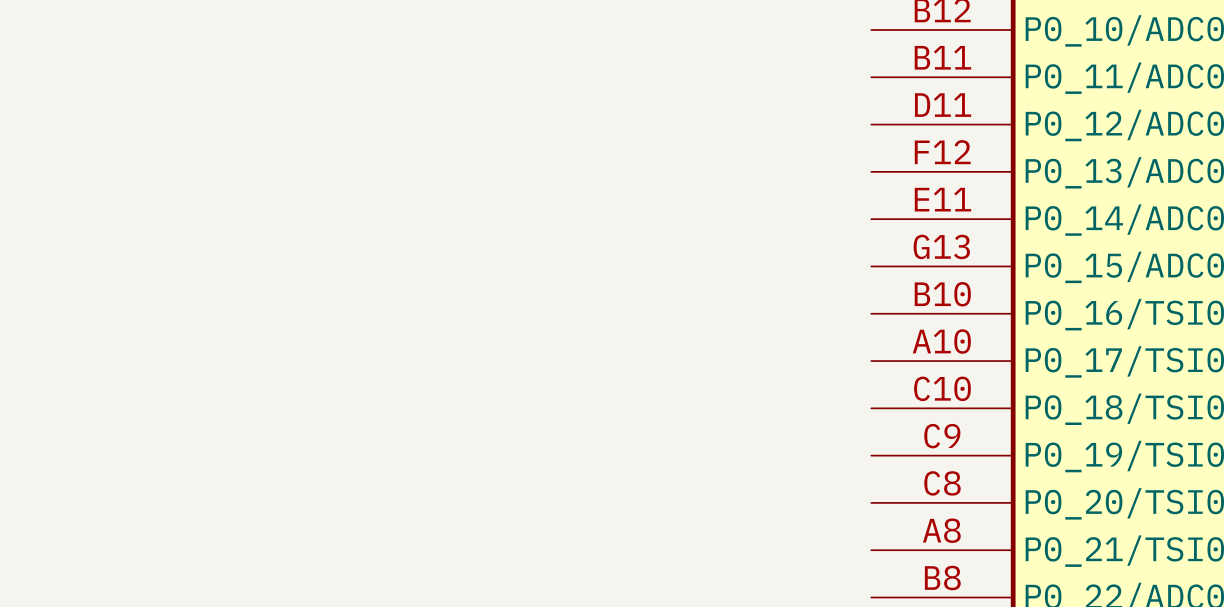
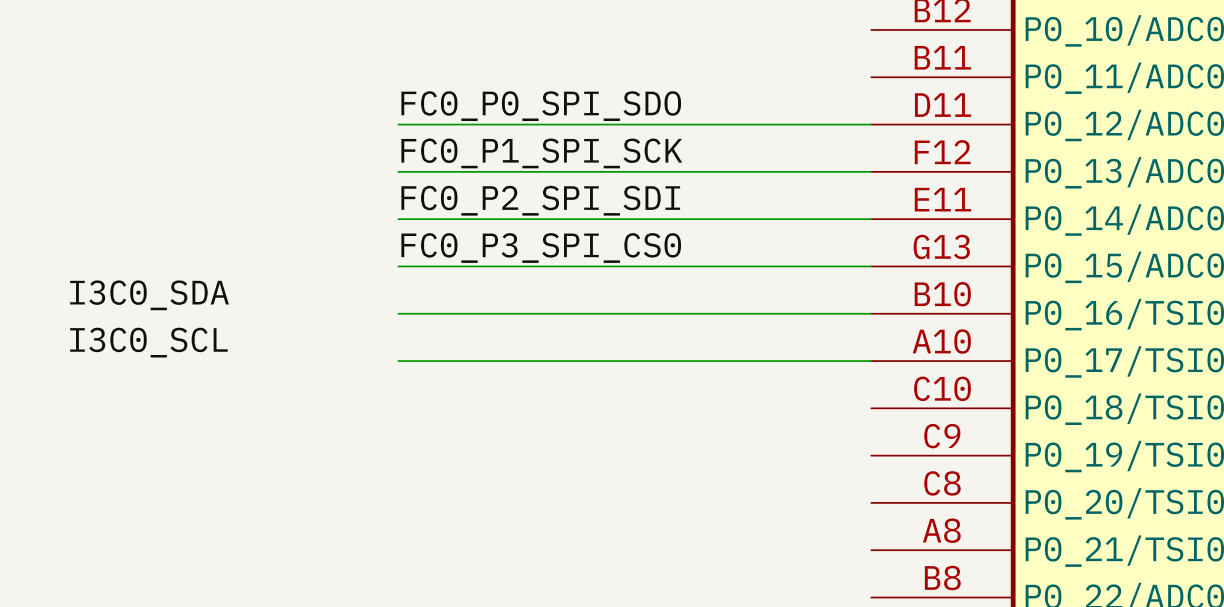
label: none -> FC0_P0_SPI_SDO (541, 106)
wire: none -> (398, 124) (871, 124)
label: none -> FC0_P1_SPI_SCK (541, 153)
wire: none -> (398, 171) (871, 171)
label: none -> FC0_P2_SPI_SDI (540, 200)
wire: none -> (398, 219) (871, 219)
label: none -> FC0_P3_SPI_CS0 (541, 248)
wire: none -> (398, 266) (871, 266)
label: none -> I3C0_SDA (149, 295)
wire: none -> (398, 313) (871, 313)
label: none -> I3C0_SCL (148, 342)
wire: none -> (398, 361) (871, 361)

